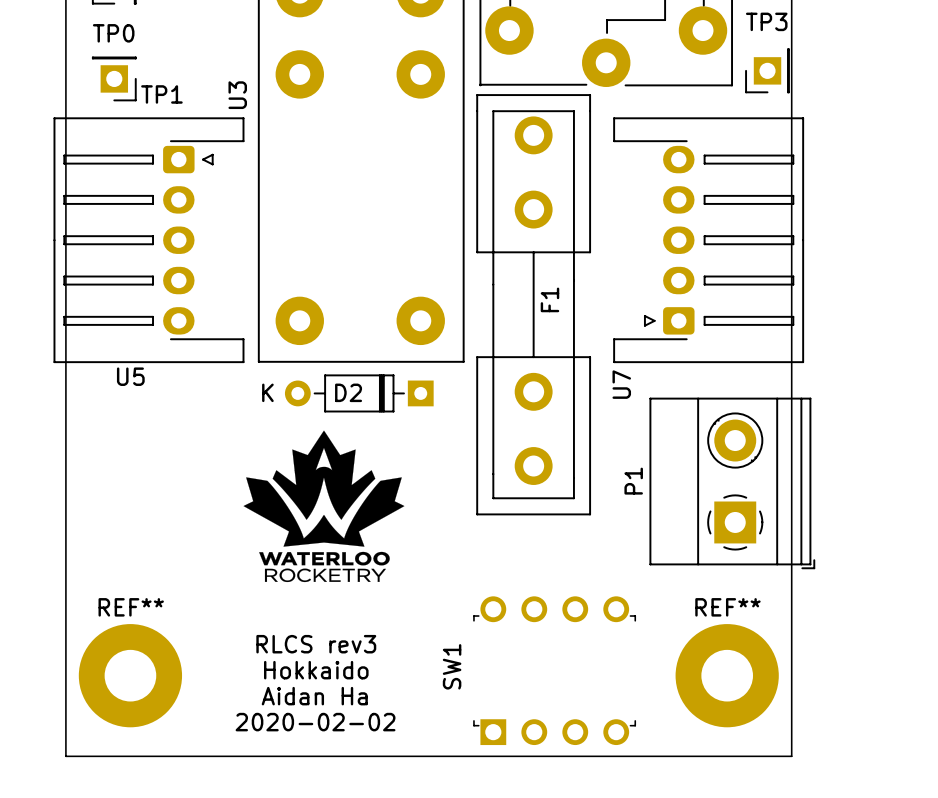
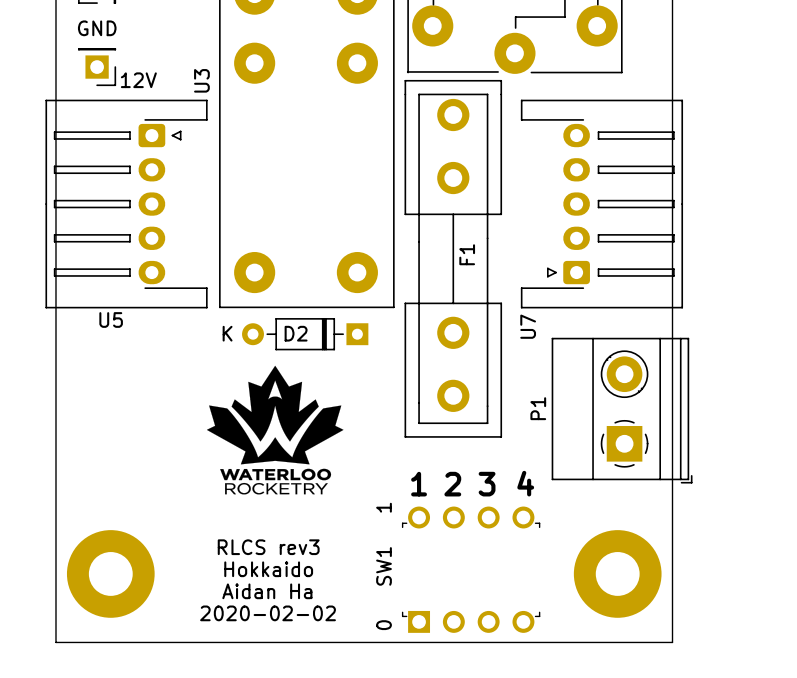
TP0 name: TP0 (113, 33) -> GND (97, 28)
TP3: (767, 70) -> none
TP1 name: TP1 (161, 94) -> 12V (138, 80)
text: none -> 1 (419, 484)
text: none -> 2 (452, 484)
text: none -> 3 (487, 484)
text: none -> 4 (525, 483)
REF** name: REF** (131, 607) -> none
REF** name: REF** (727, 607) -> none
SW1 name: SW1 (452, 666) -> 0 SW1 1 (384, 566)

